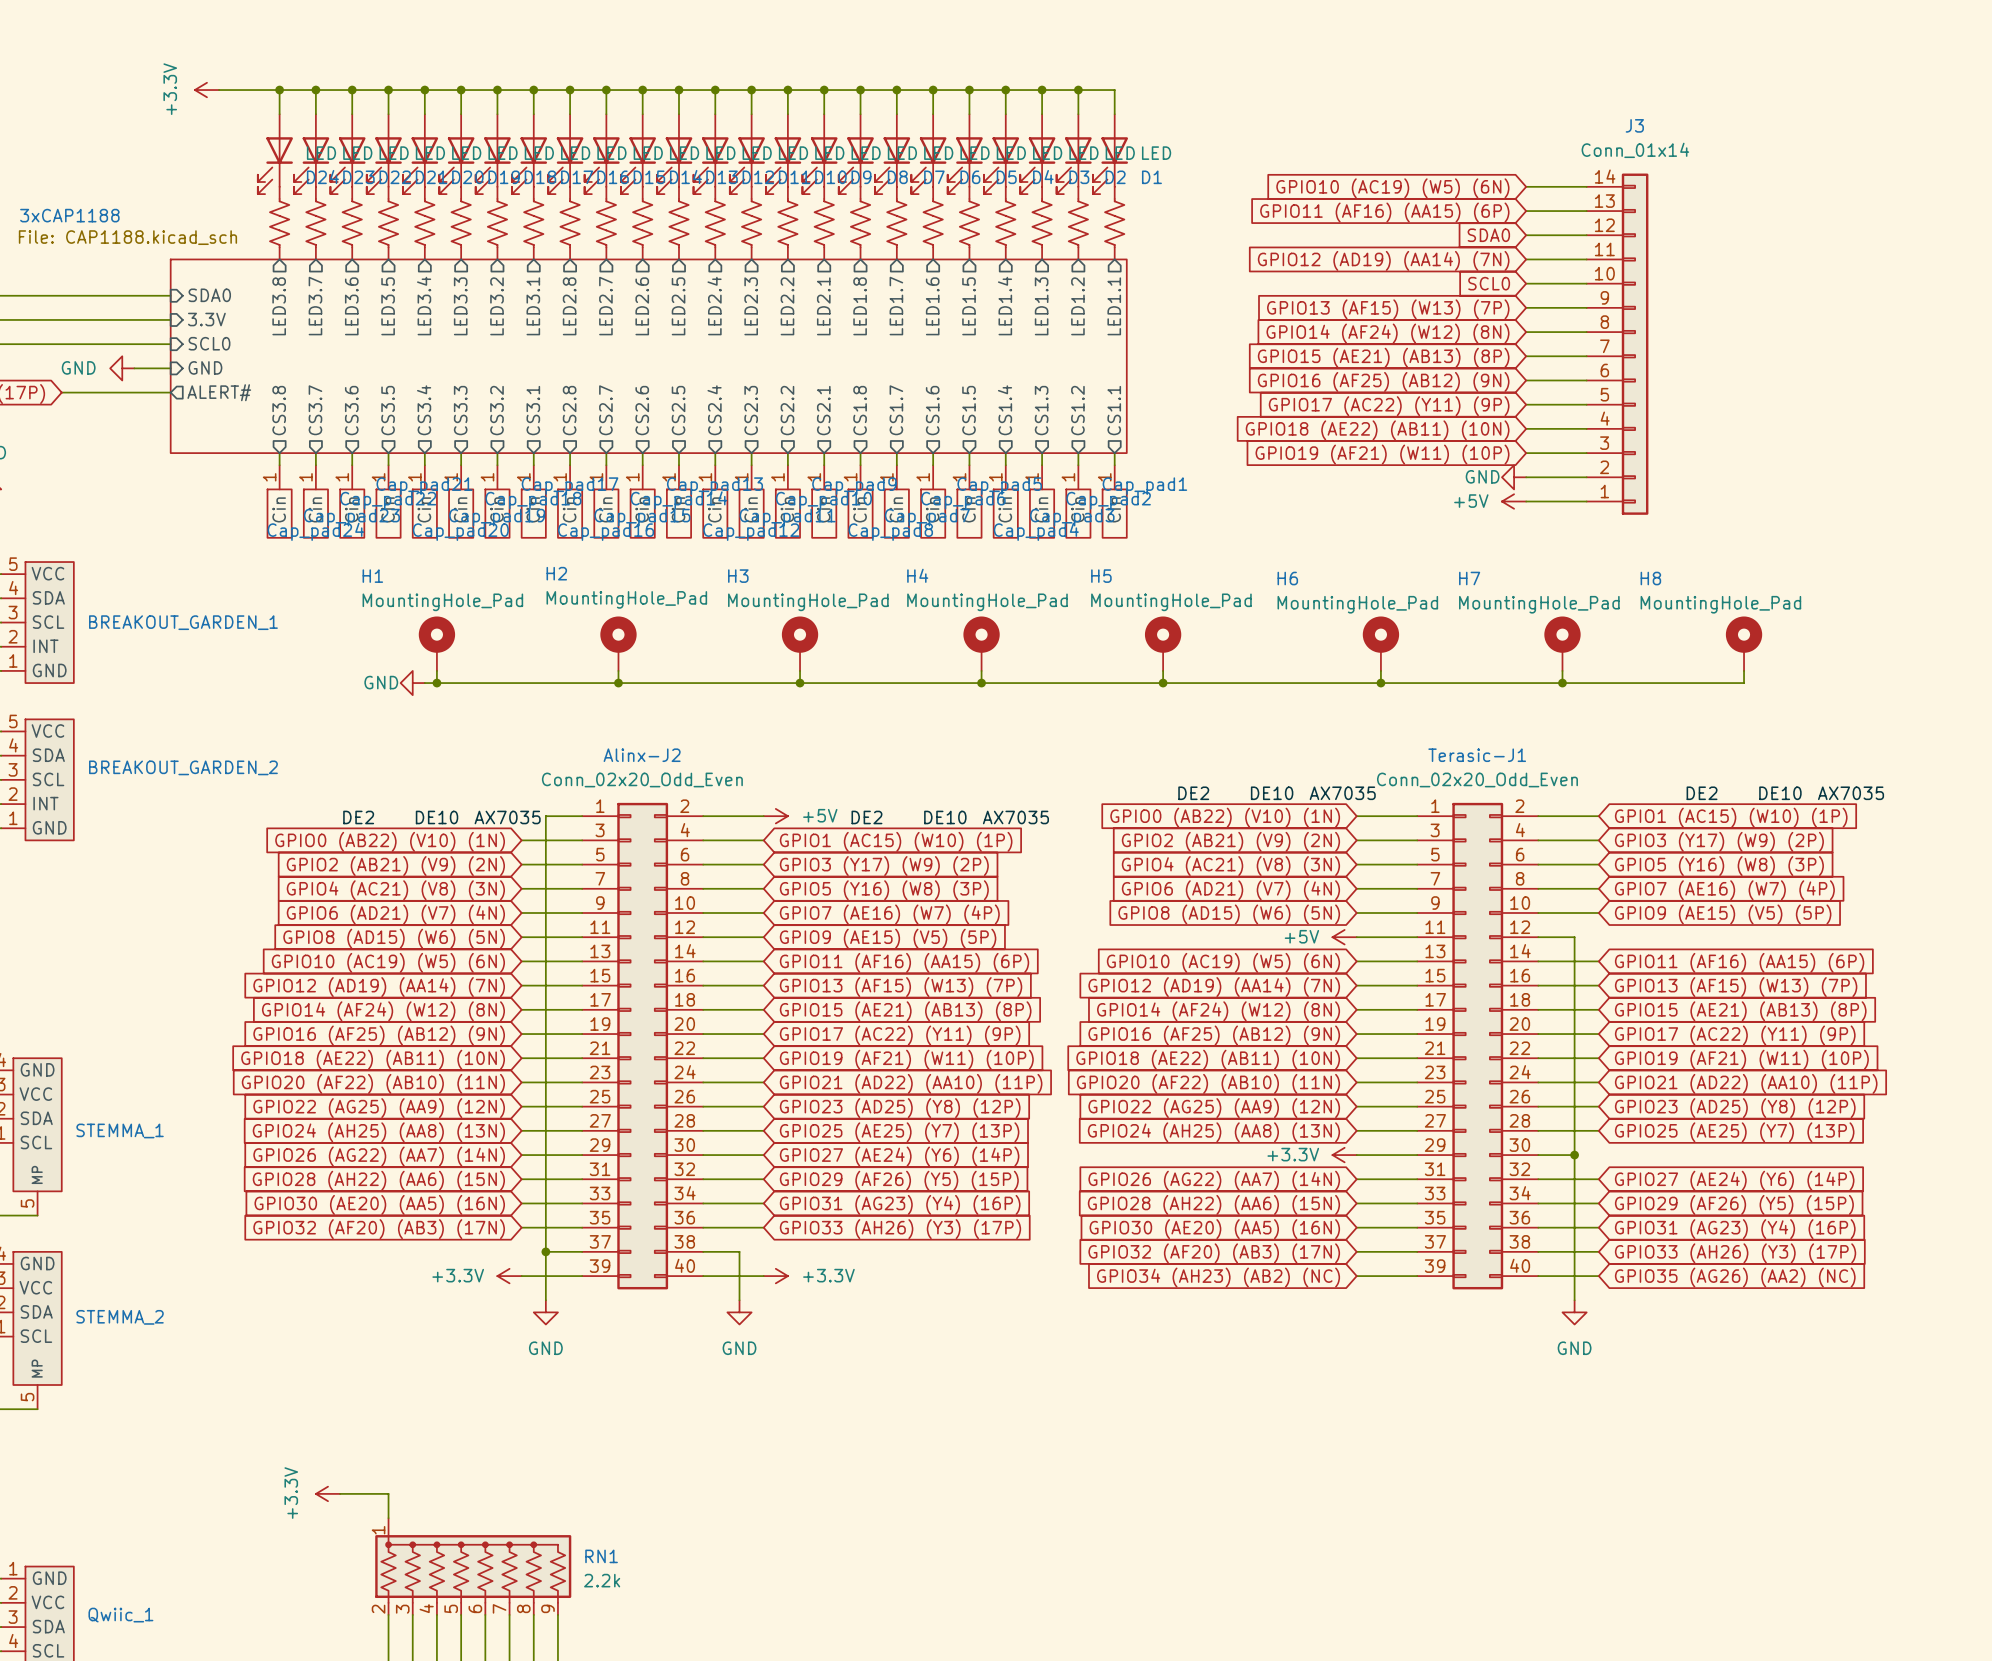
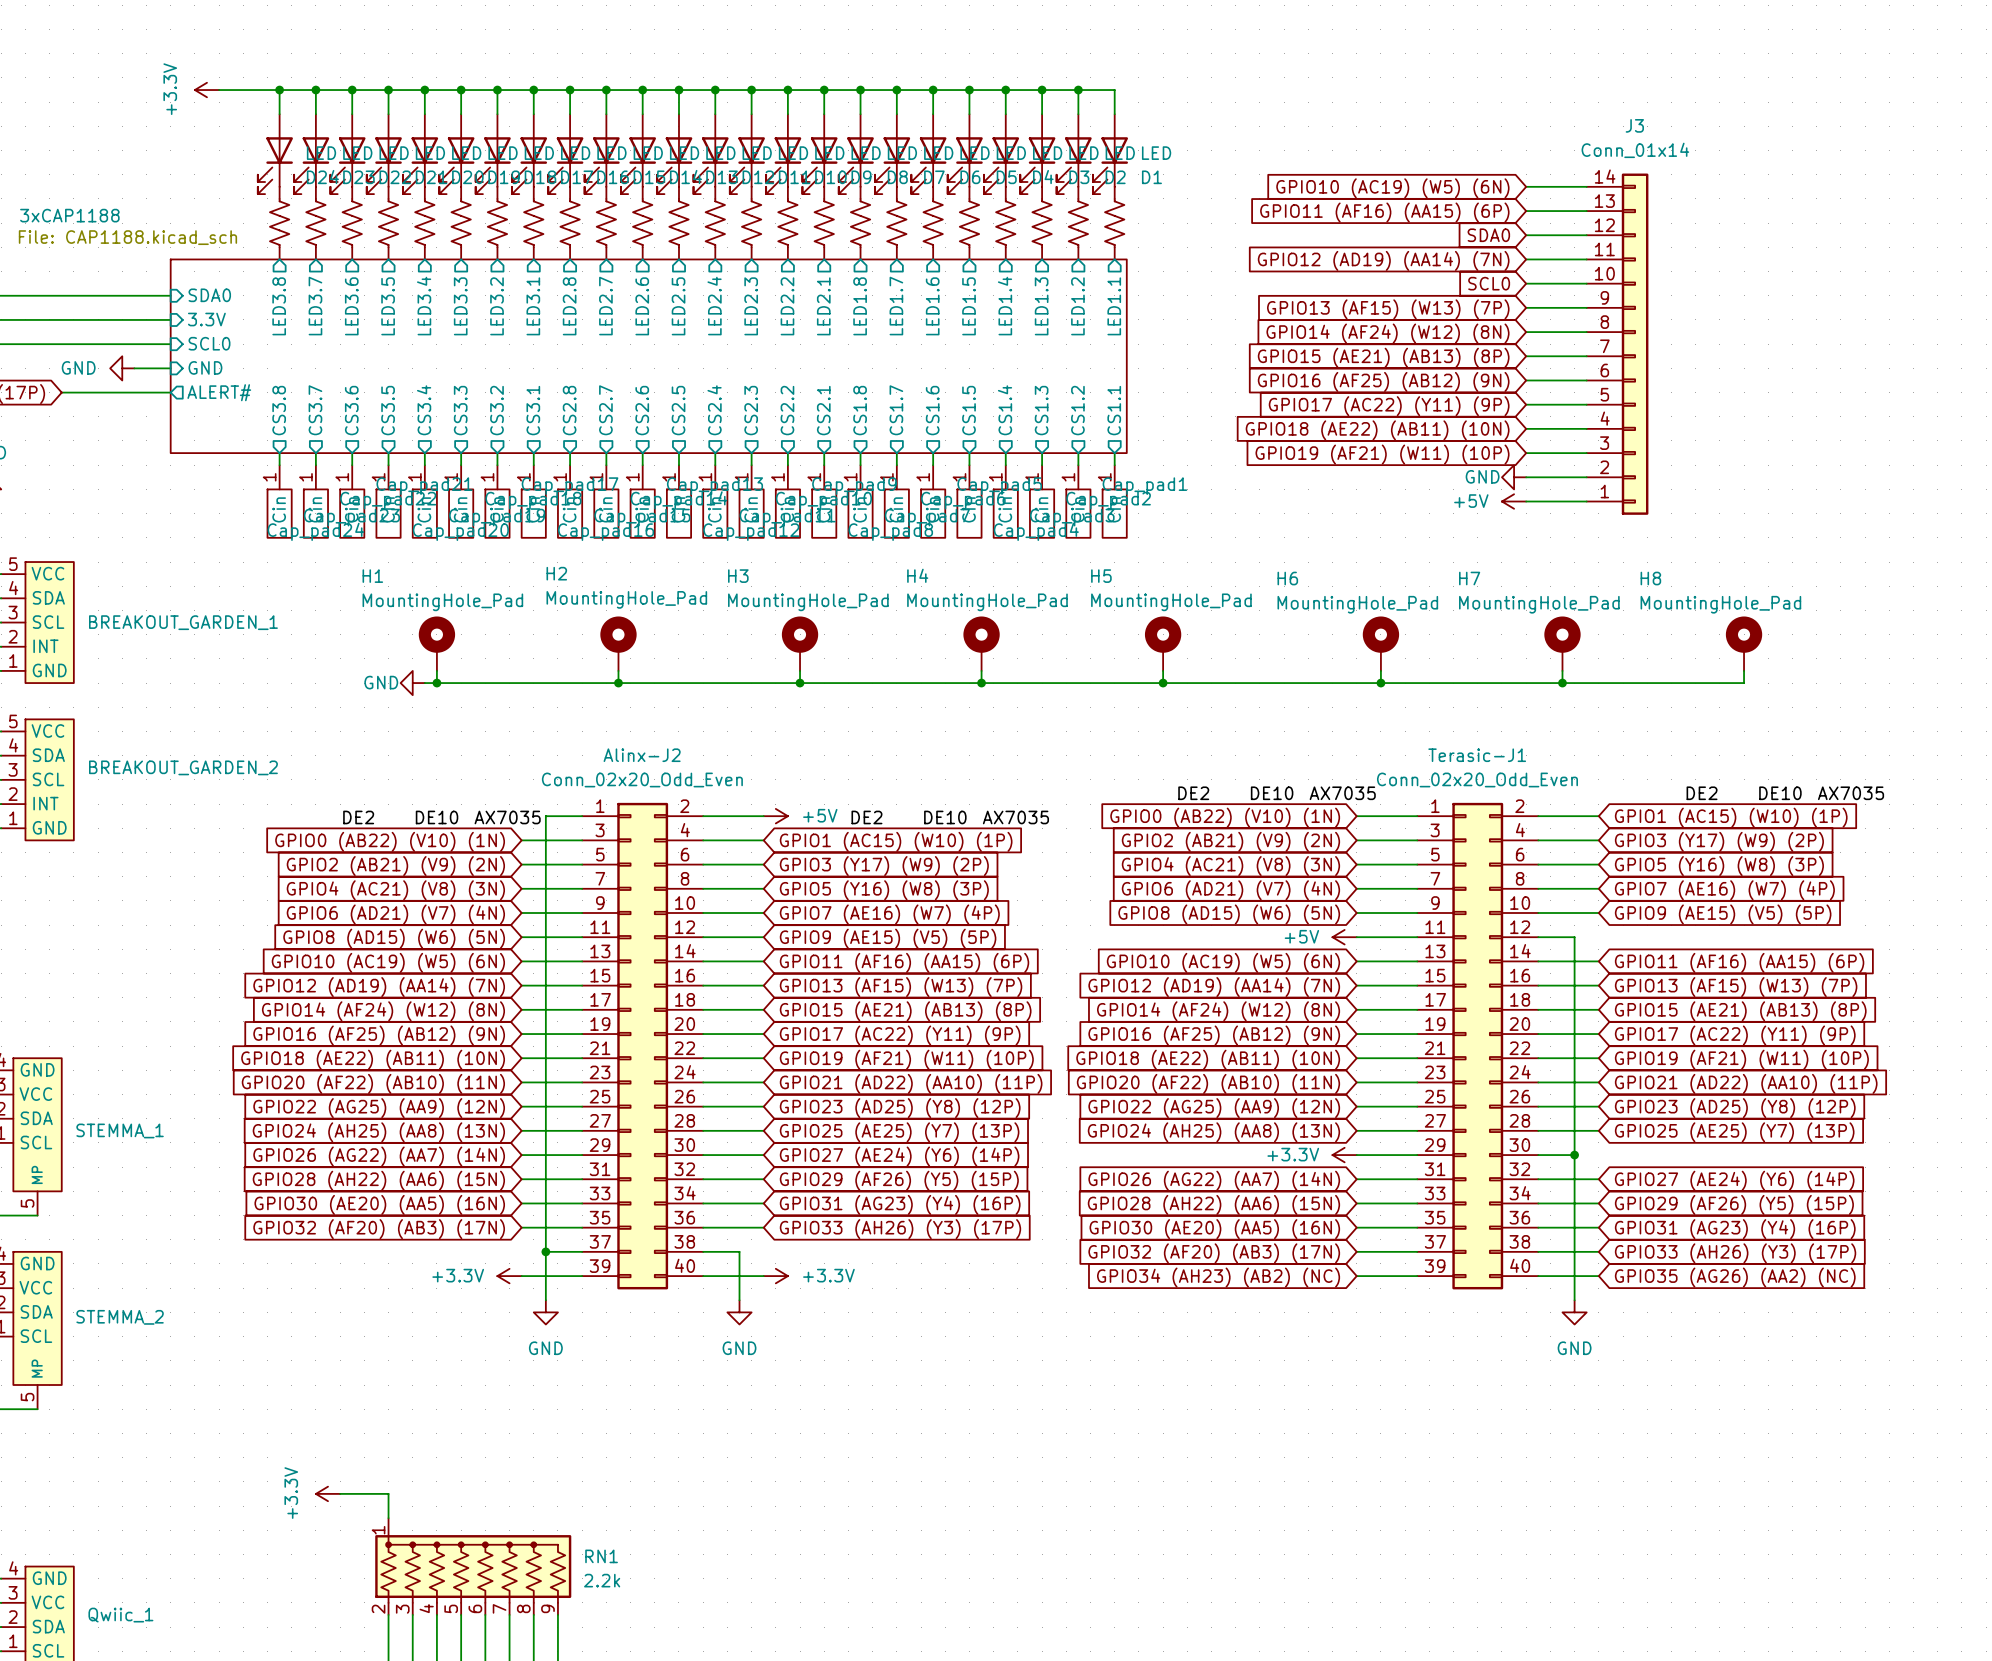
Qwiic_1 pin number: 1 (13, 1568) -> 4 (13, 1568)
Qwiic_1 pin number: 2 (13, 1592) -> 3 (13, 1592)
Qwiic_1 pin number: 3 (13, 1617) -> 2 (13, 1617)
Qwiic_1 pin number: 4 (13, 1640) -> 1 (13, 1641)

